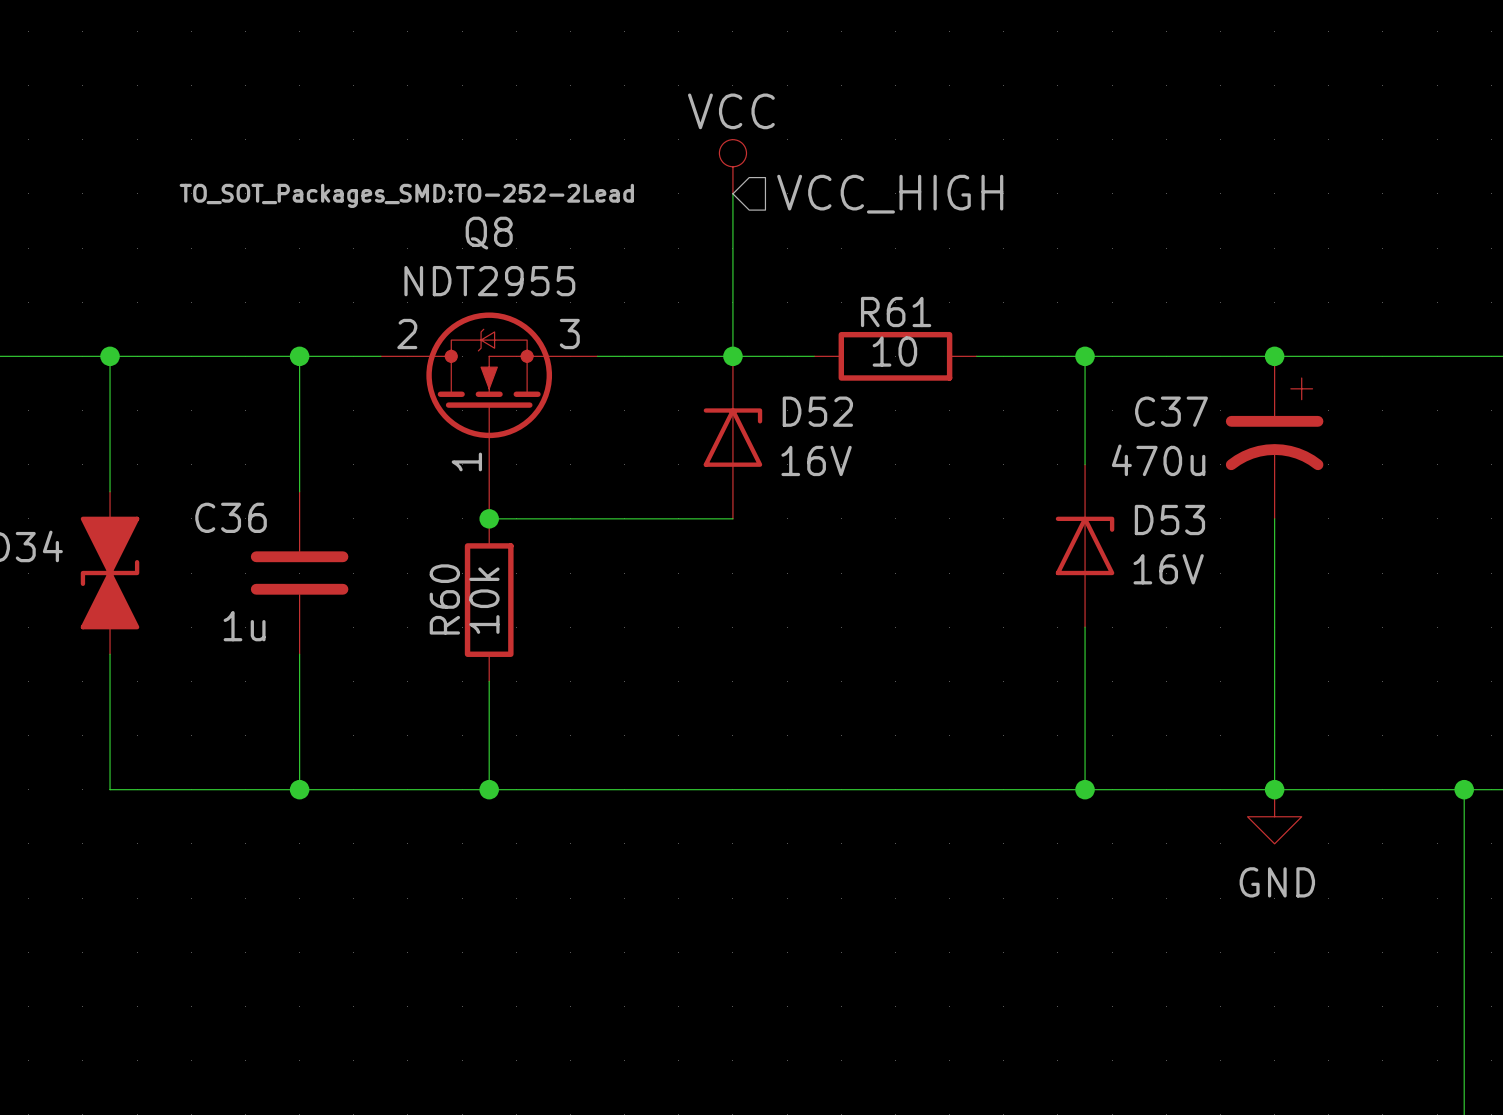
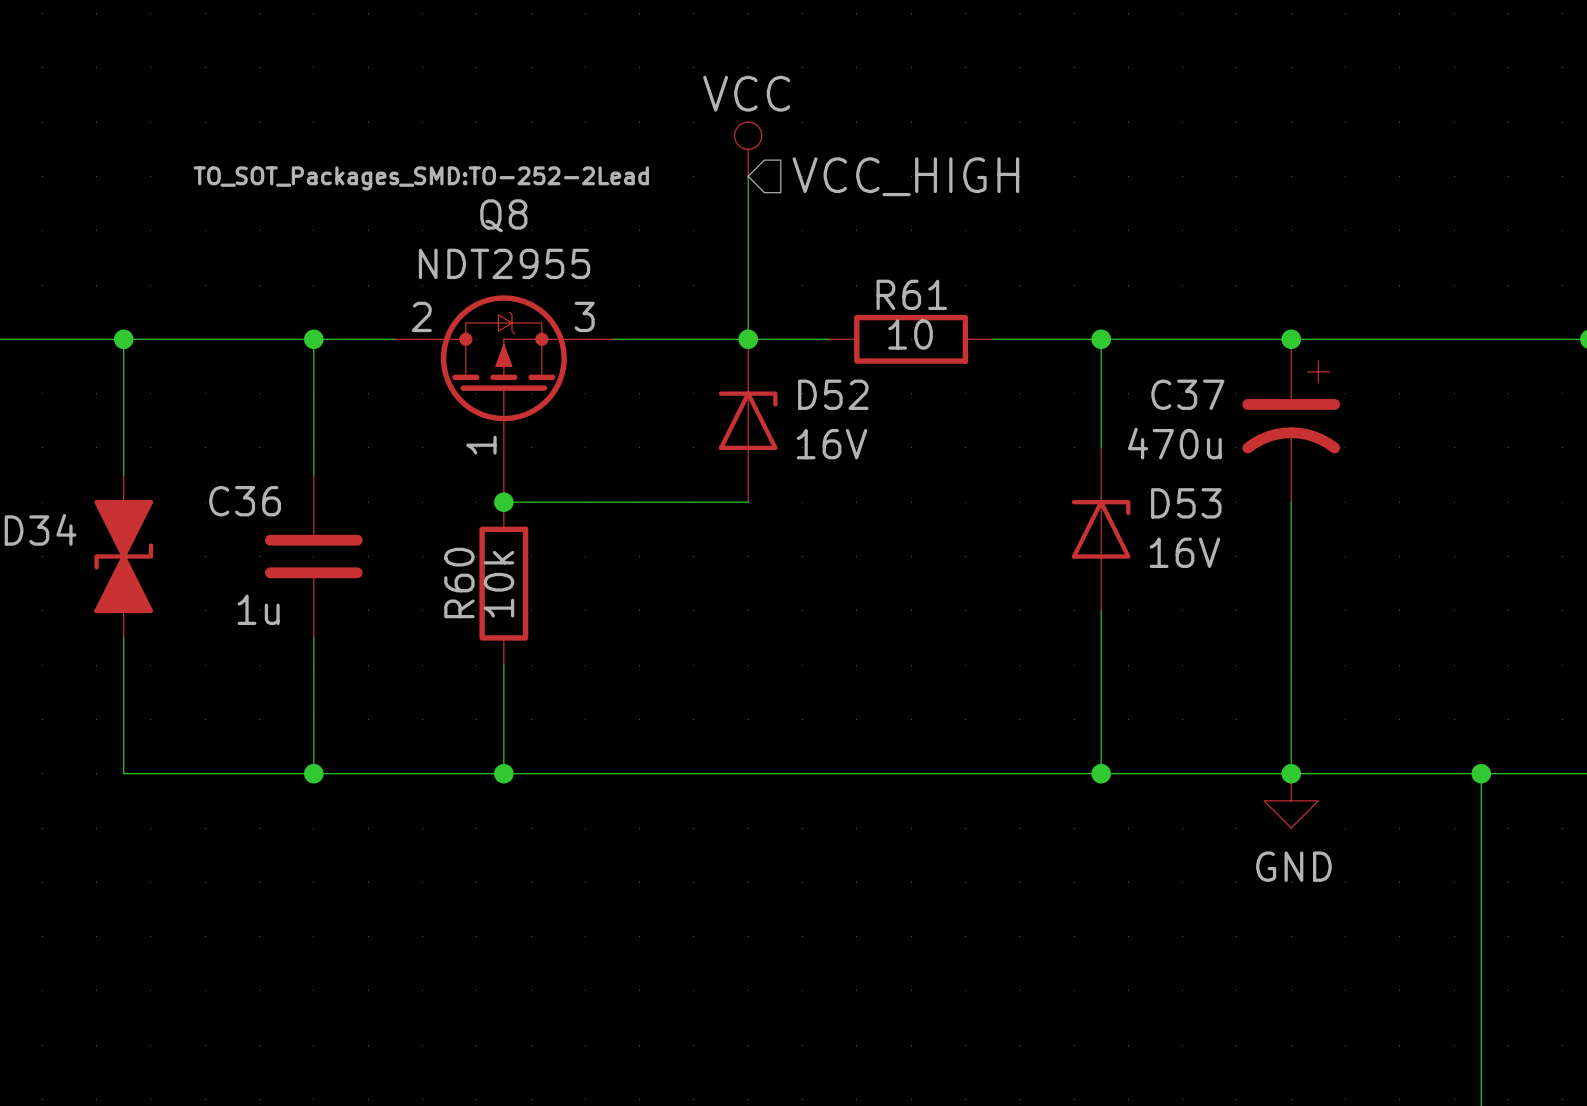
Q8 symbol: [380, 312, 598, 519] -> [395, 295, 613, 503]

